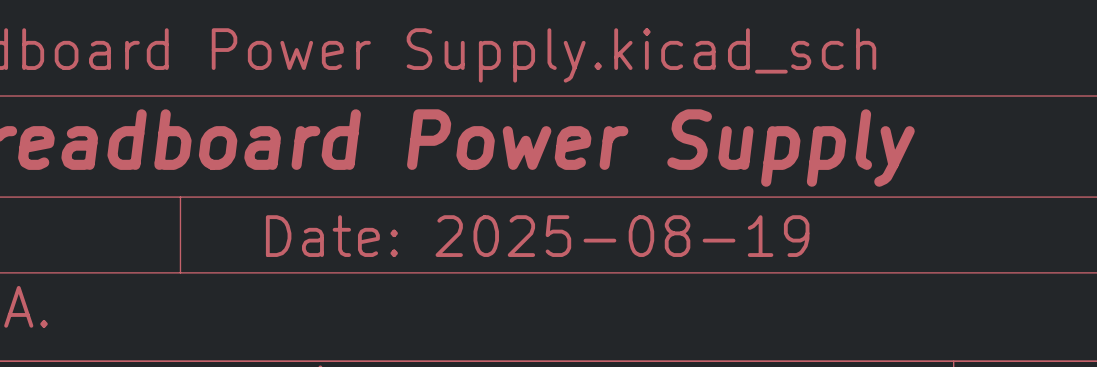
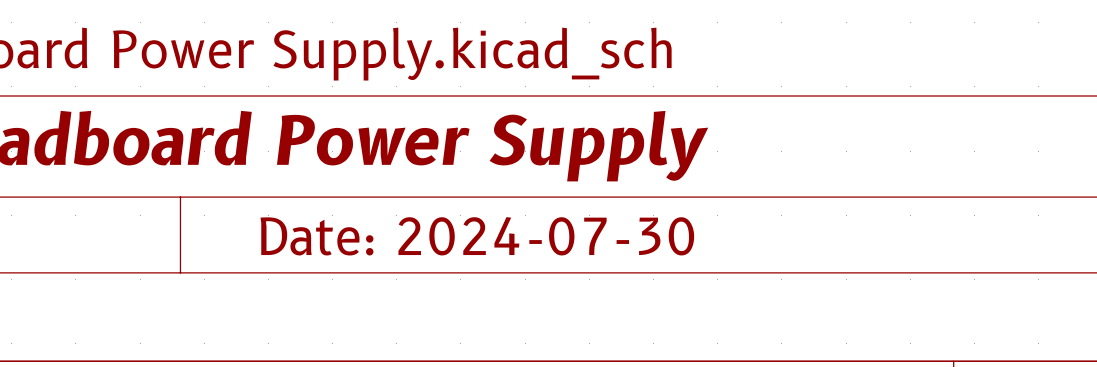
title block: Date: 2025-08-19 (537, 236) -> Date: 2024-07-30 (477, 236)

